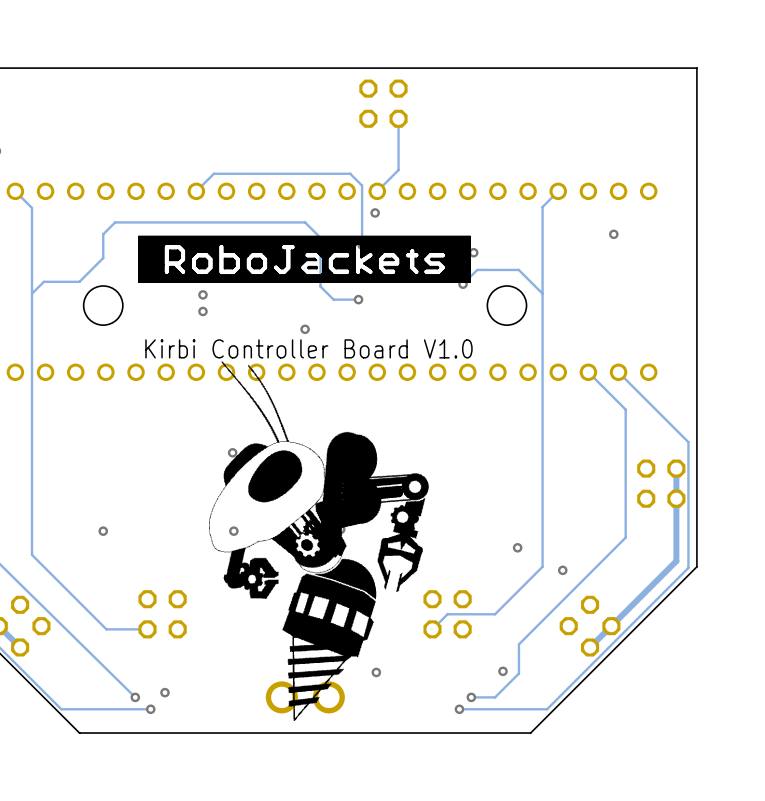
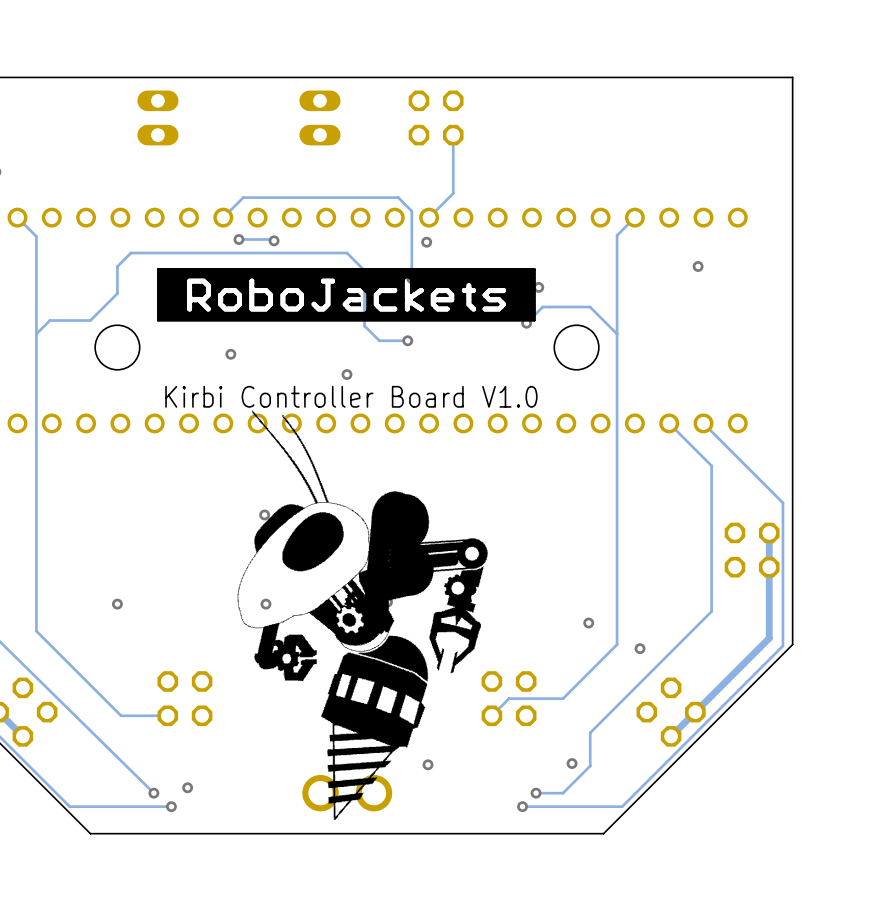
part: none -> (157, 117)
part: none -> (319, 117)
track: none -> (238, 239) (274, 240)
via: none -> (238, 239)
via: none -> (274, 240)
via: (202, 294) -> none

